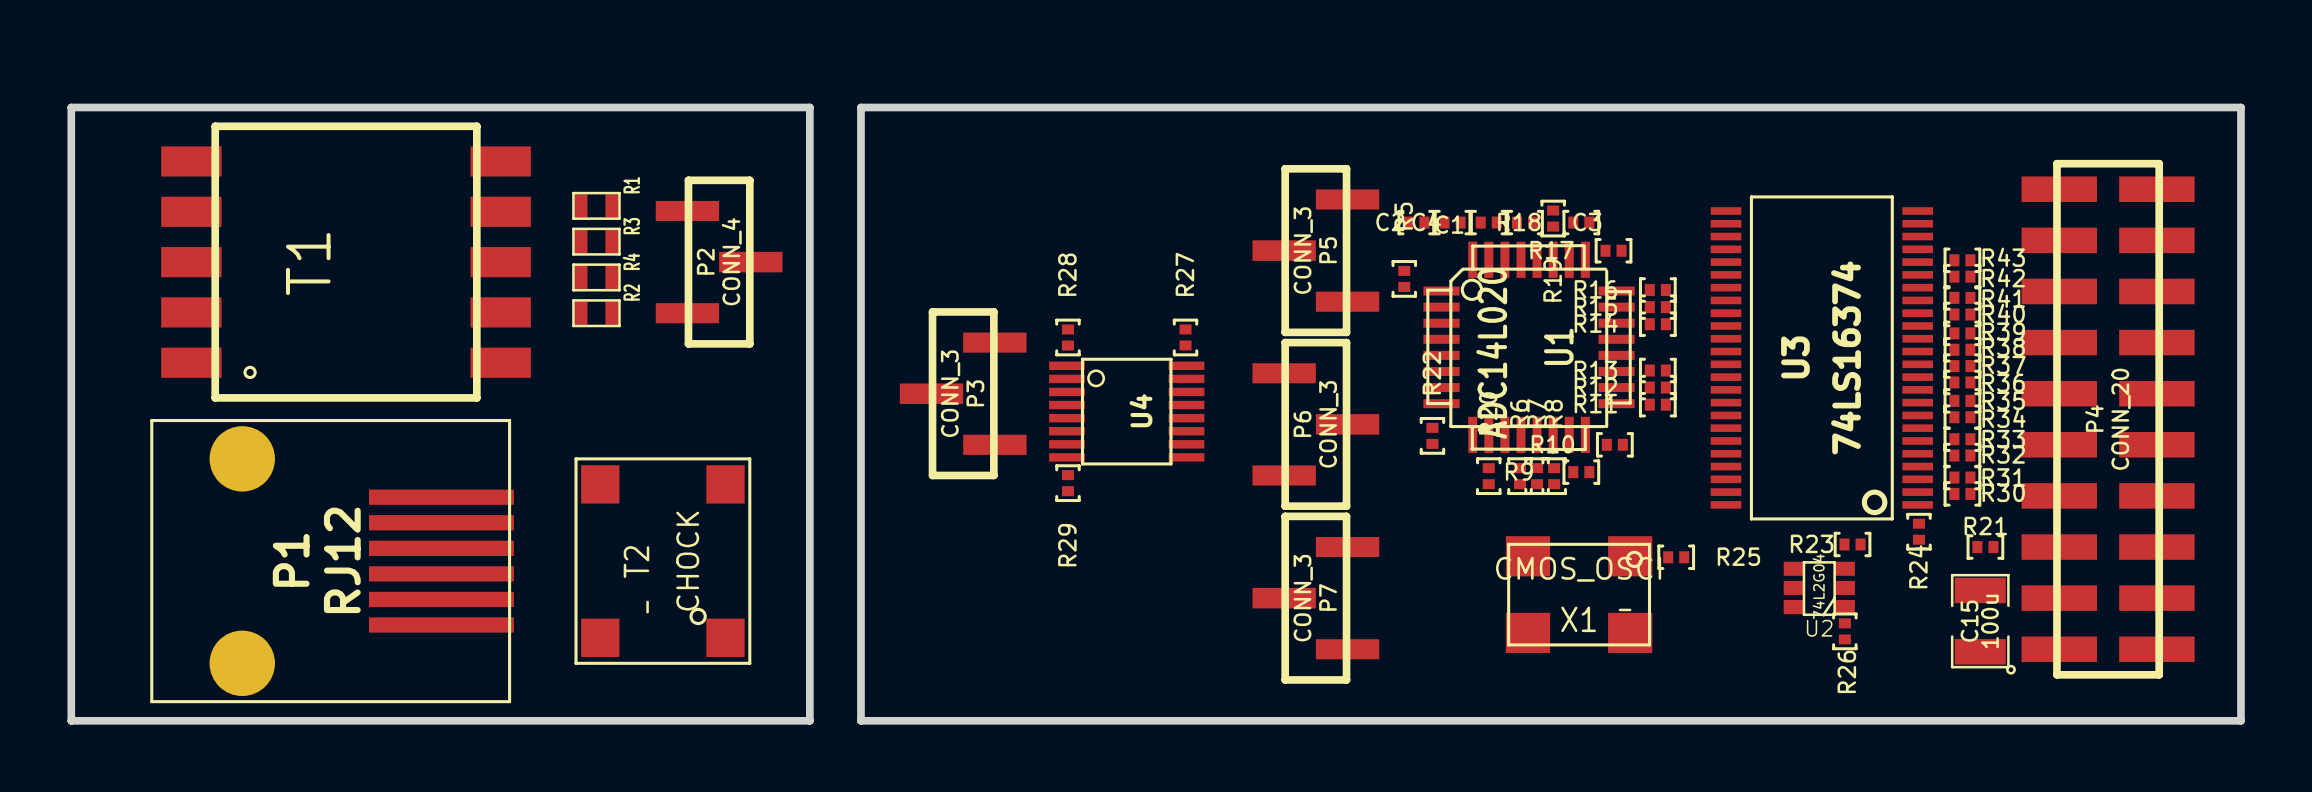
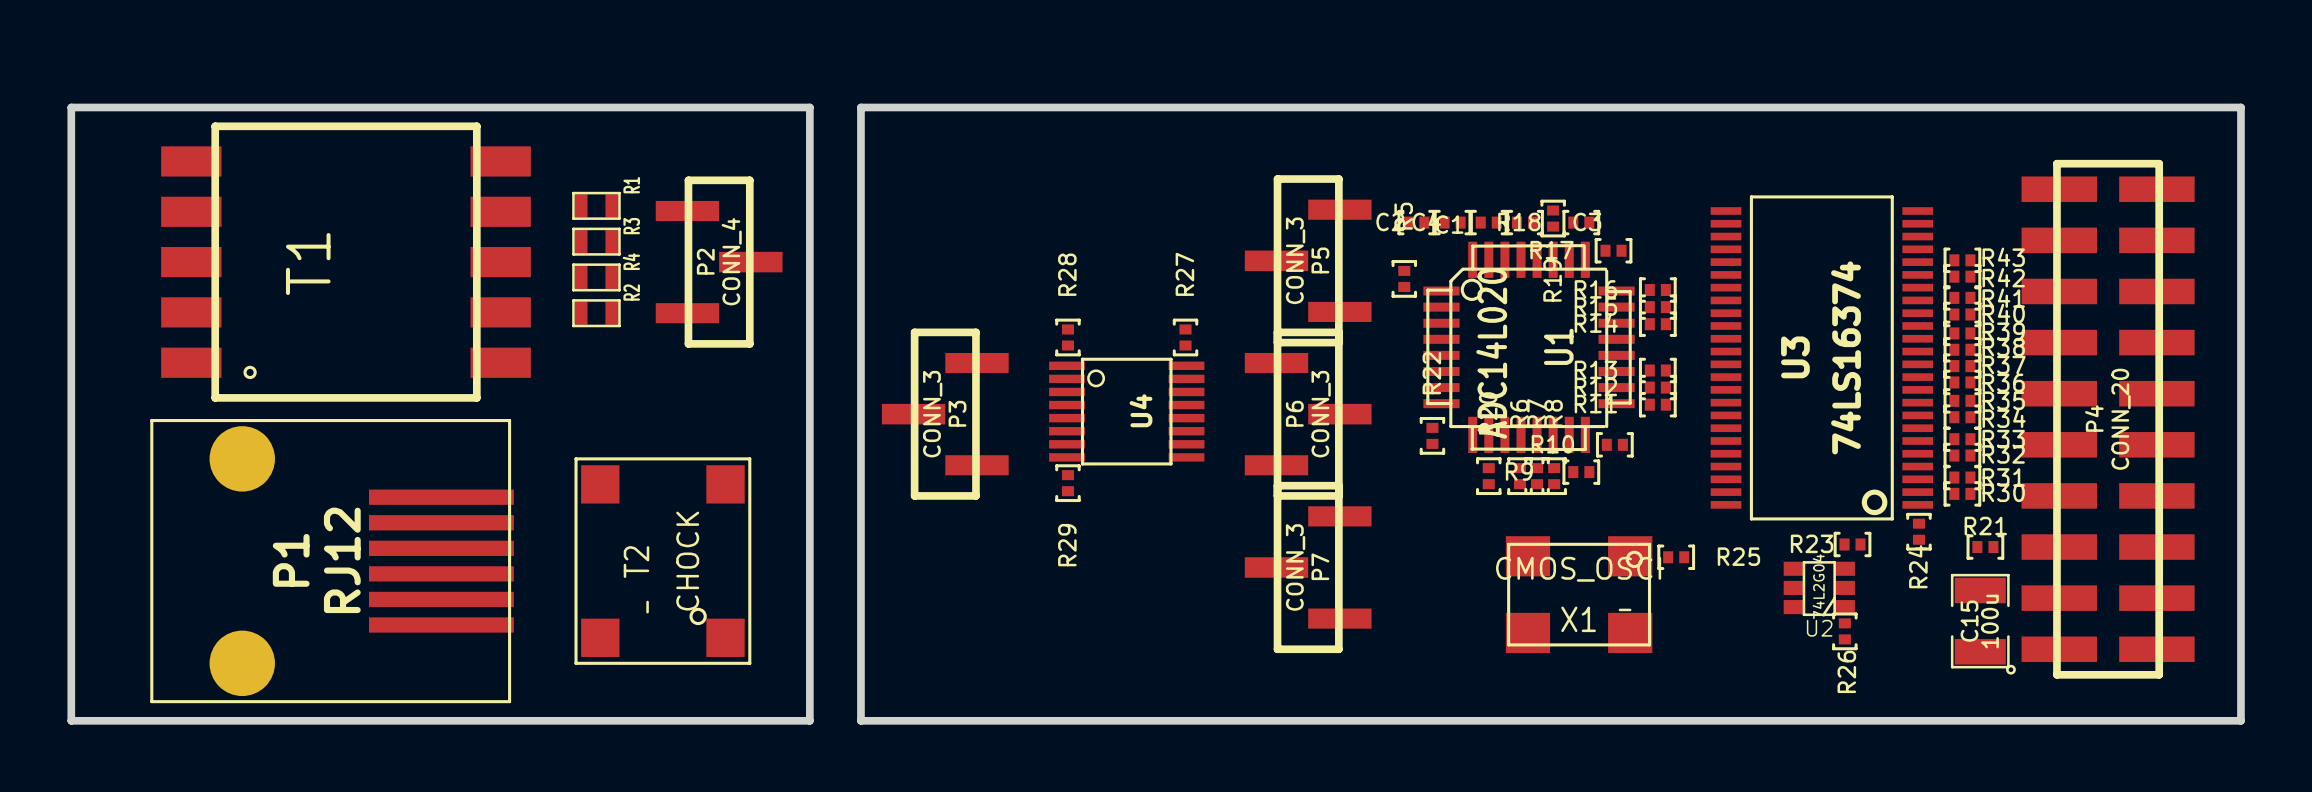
P5 position: (1315, 250) -> (1308, 260)
P3 position: (963, 393) -> (945, 414)
P6 position: (1315, 424) -> (1308, 414)
P7 position: (1315, 598) -> (1308, 567)

